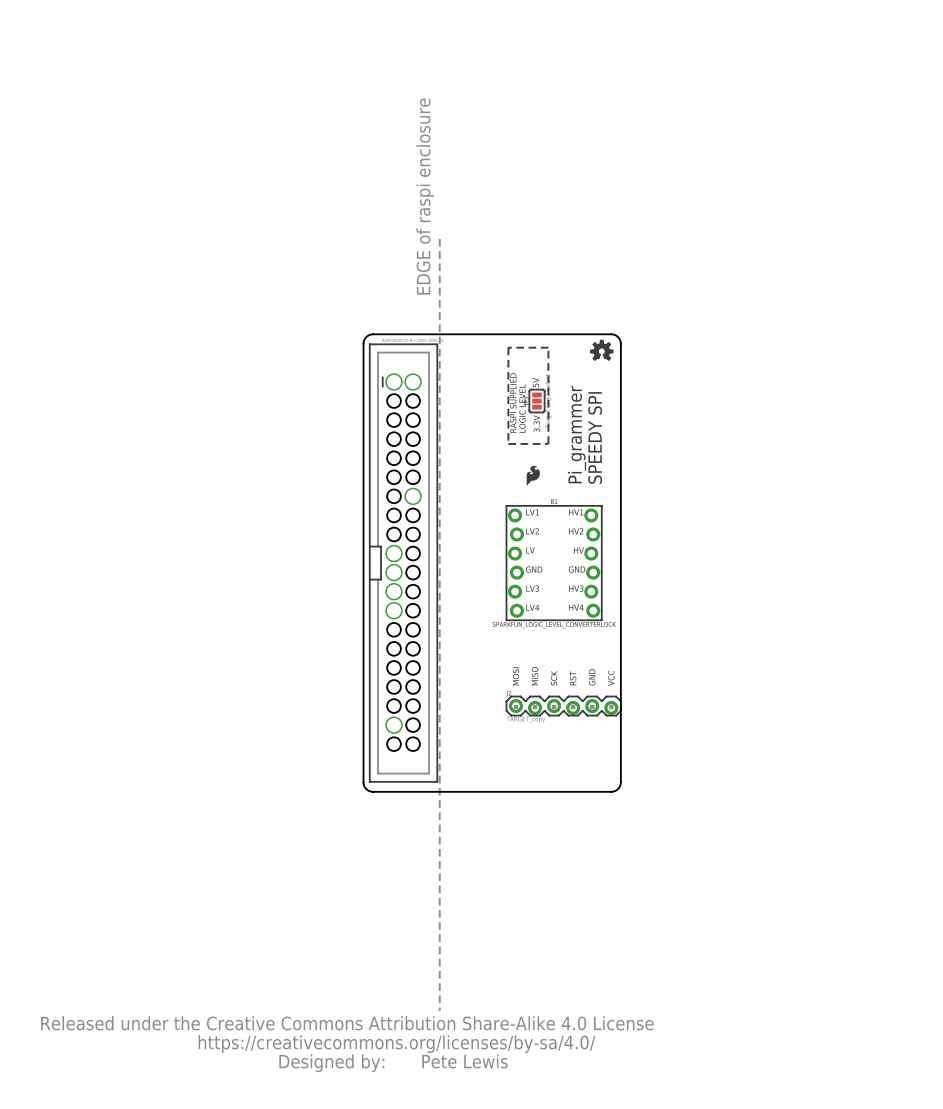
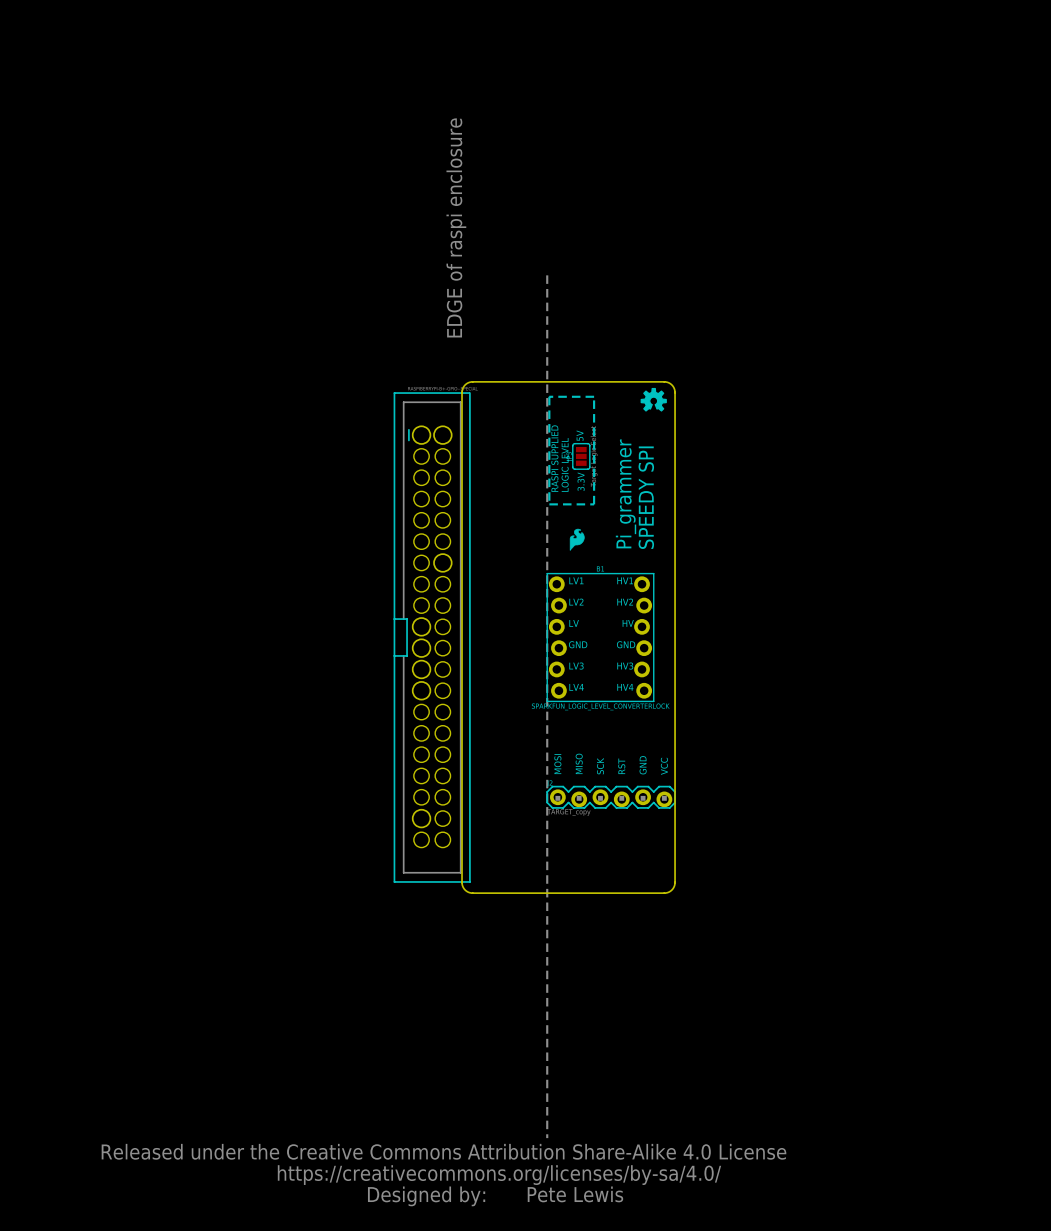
line: (439, 239) (439, 1011) -> (547, 275) (547, 1138)
board edge: (439, 334) (371, 334) (365, 338) (363, 343) (363, 783) (366, 789) (371, 791) (439, 791) -> (472, 381) (465, 384) (462, 392) (462, 882) (465, 890) (472, 893)
drawing position: (347, 1044) -> (443, 1175)
text position: Pete Lewis (465, 1061) -> Pete Lewis (575, 1194)

